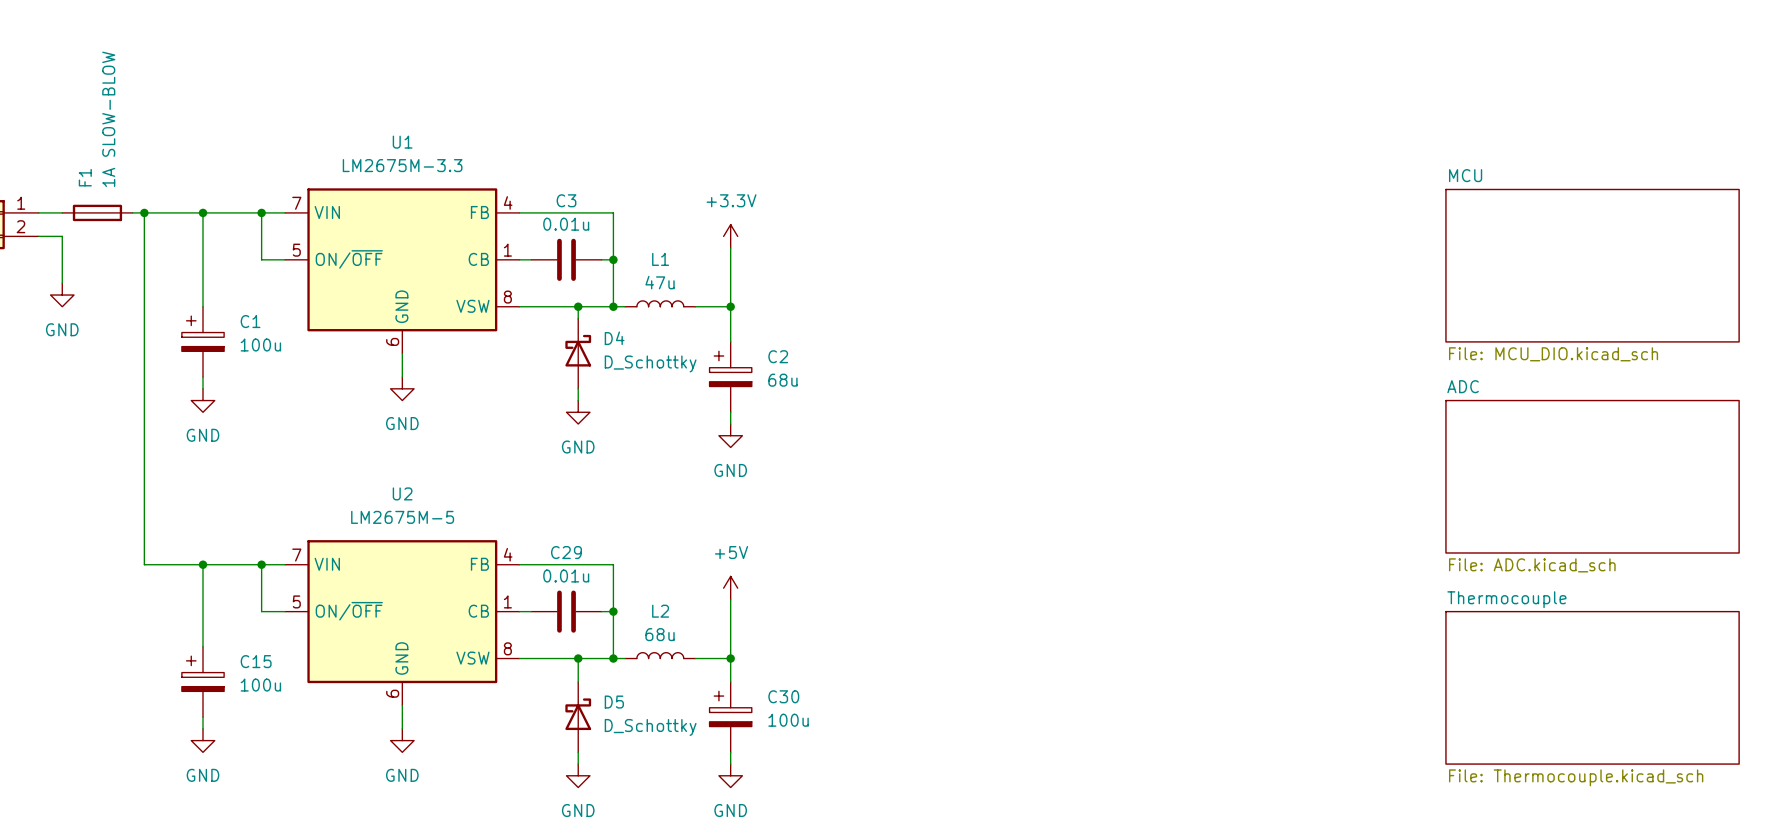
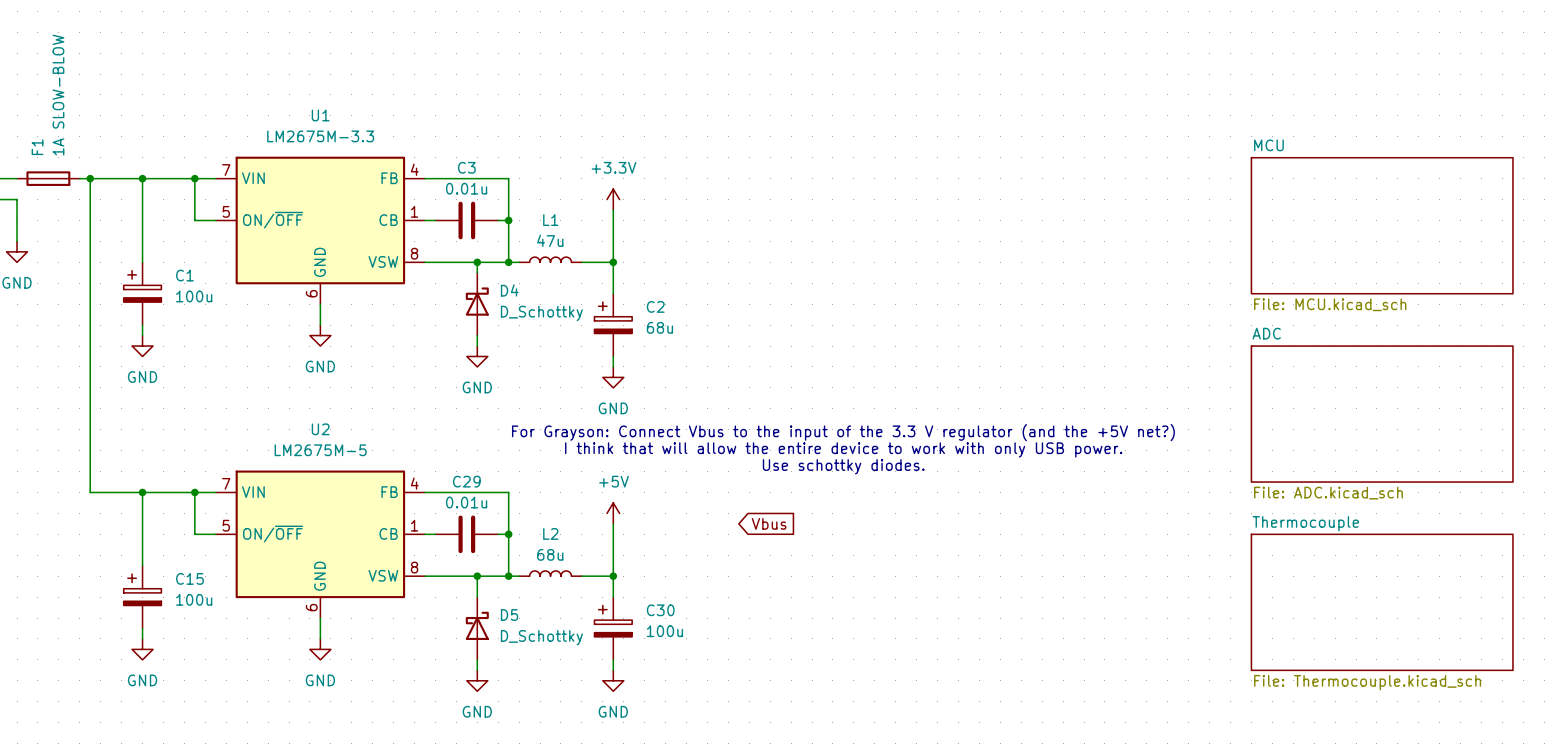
sheet MCU value: File: MCU_DIO.kicad_sch (1553, 354) -> File: MCU.kicad_sch (1330, 304)
text: none -> For Grayson: Connect Vbus to the input of the 3.3 V regulator (and the +5V net?) (843, 432)
text: none -> I think that will allow the entire device to work with only USB power. (843, 449)
text: none -> Use schottky diodes. (843, 466)
global label: none -> Vbus (769, 523)

